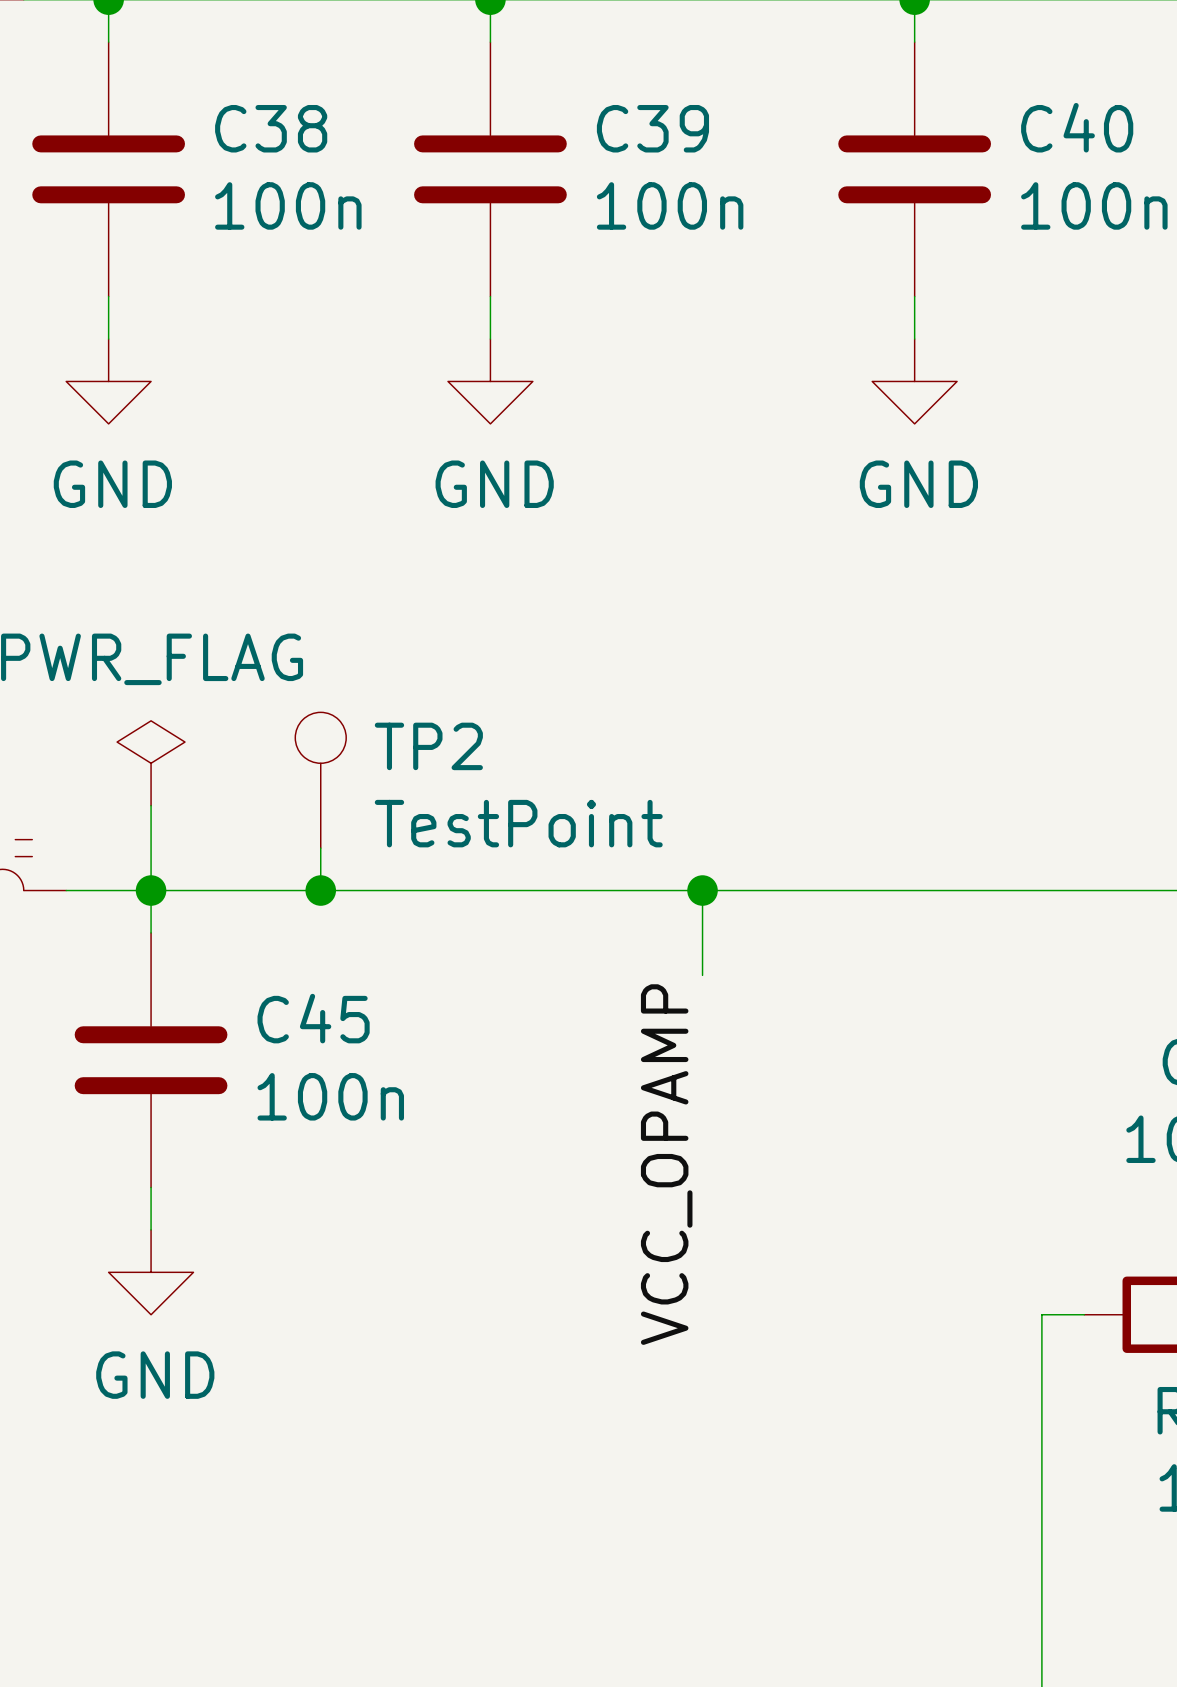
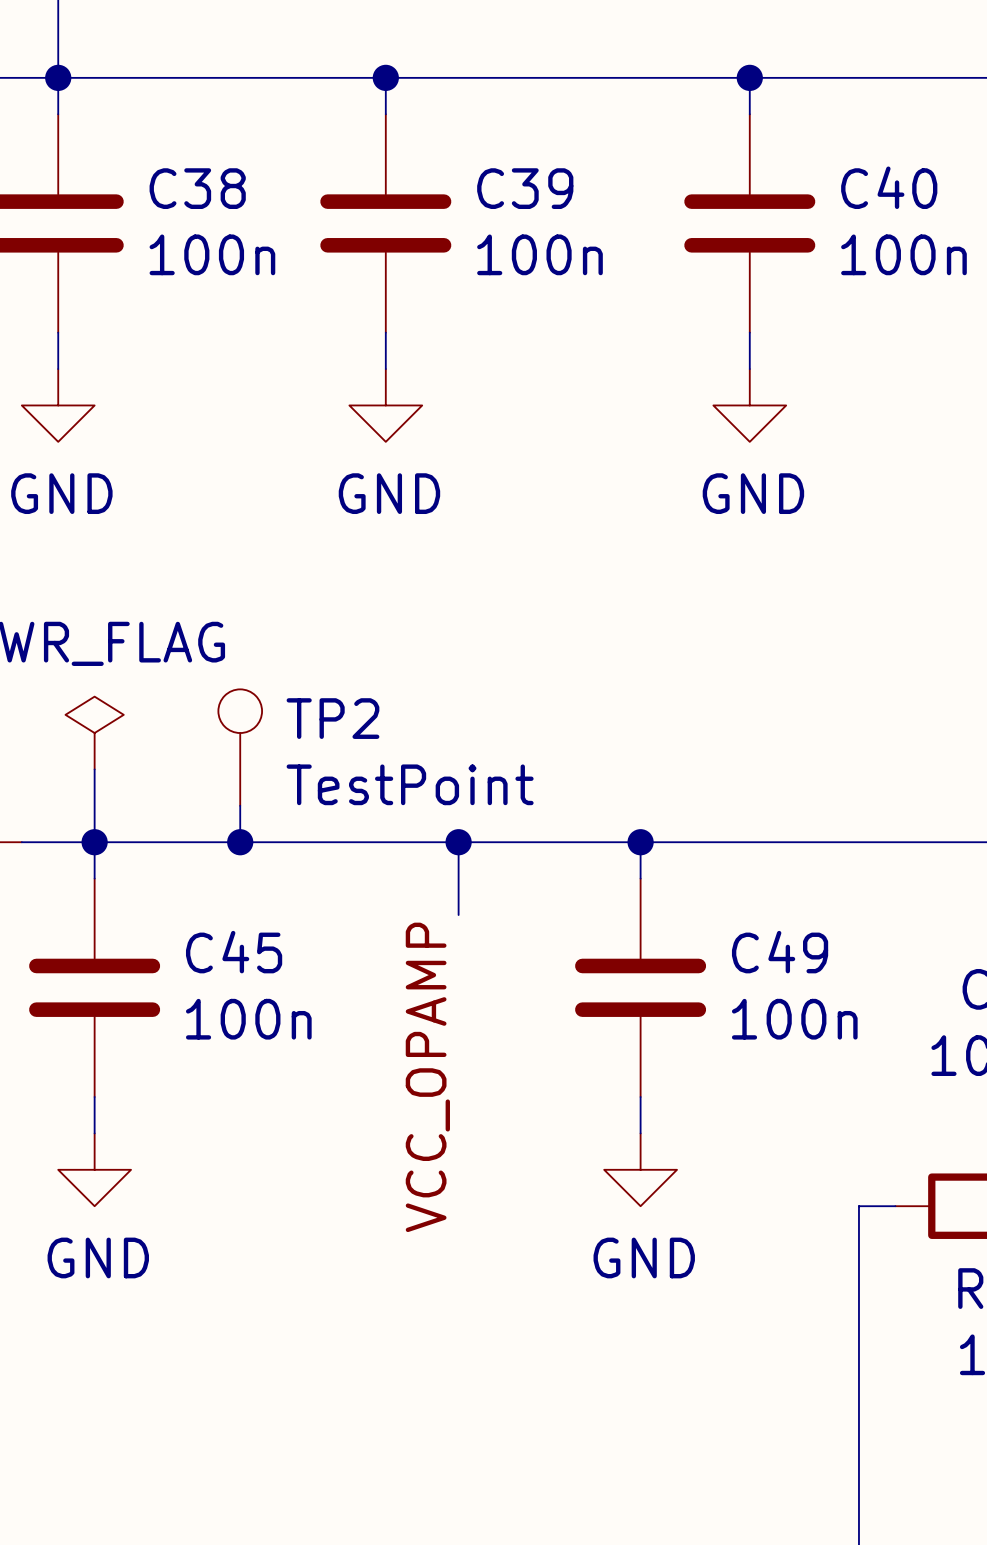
junction: none -> (458, 842)
wire: (702, 890) (702, 975) -> (458, 842) (458, 915)
junction: (702, 890) -> none
wire: none -> (640, 842) (640, 878)
junction: none -> (640, 842)
C49: none -> 100n (640, 987)
label position: VCC_OPAMP (666, 1164) -> VCC_OPAMP (427, 1077)
wire: none -> (640, 1097) (640, 1133)
power symbol: none -> GND (640, 1169)

